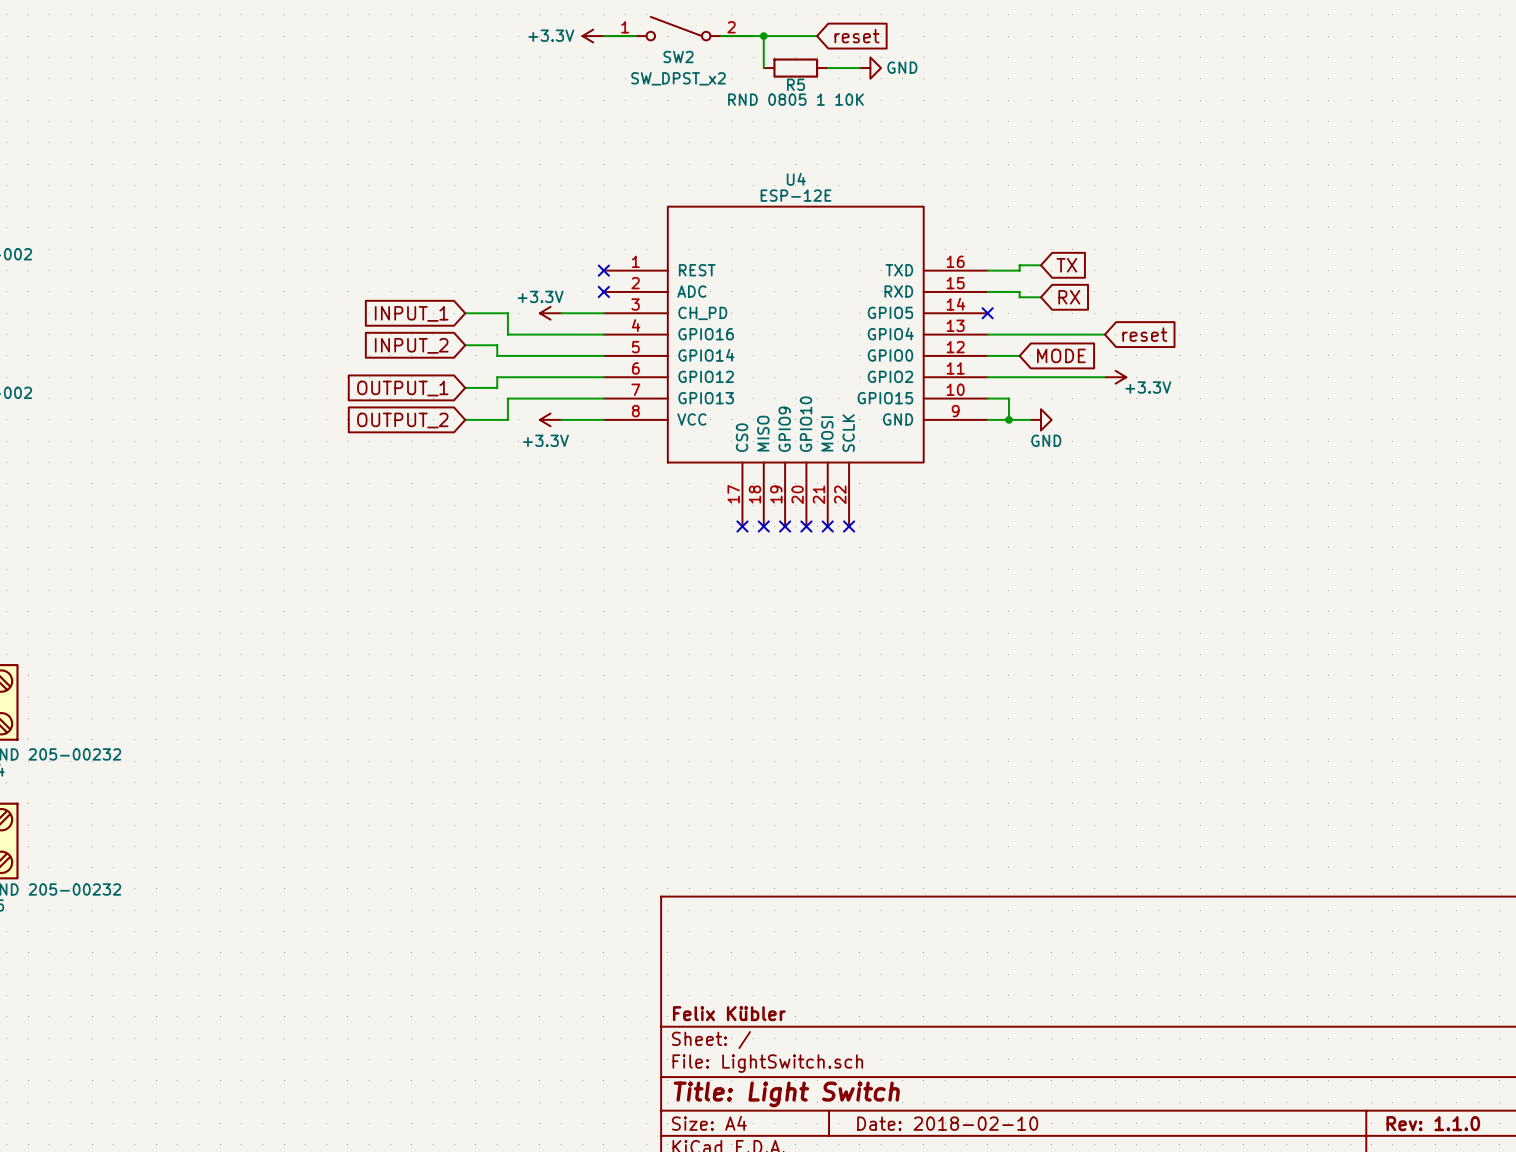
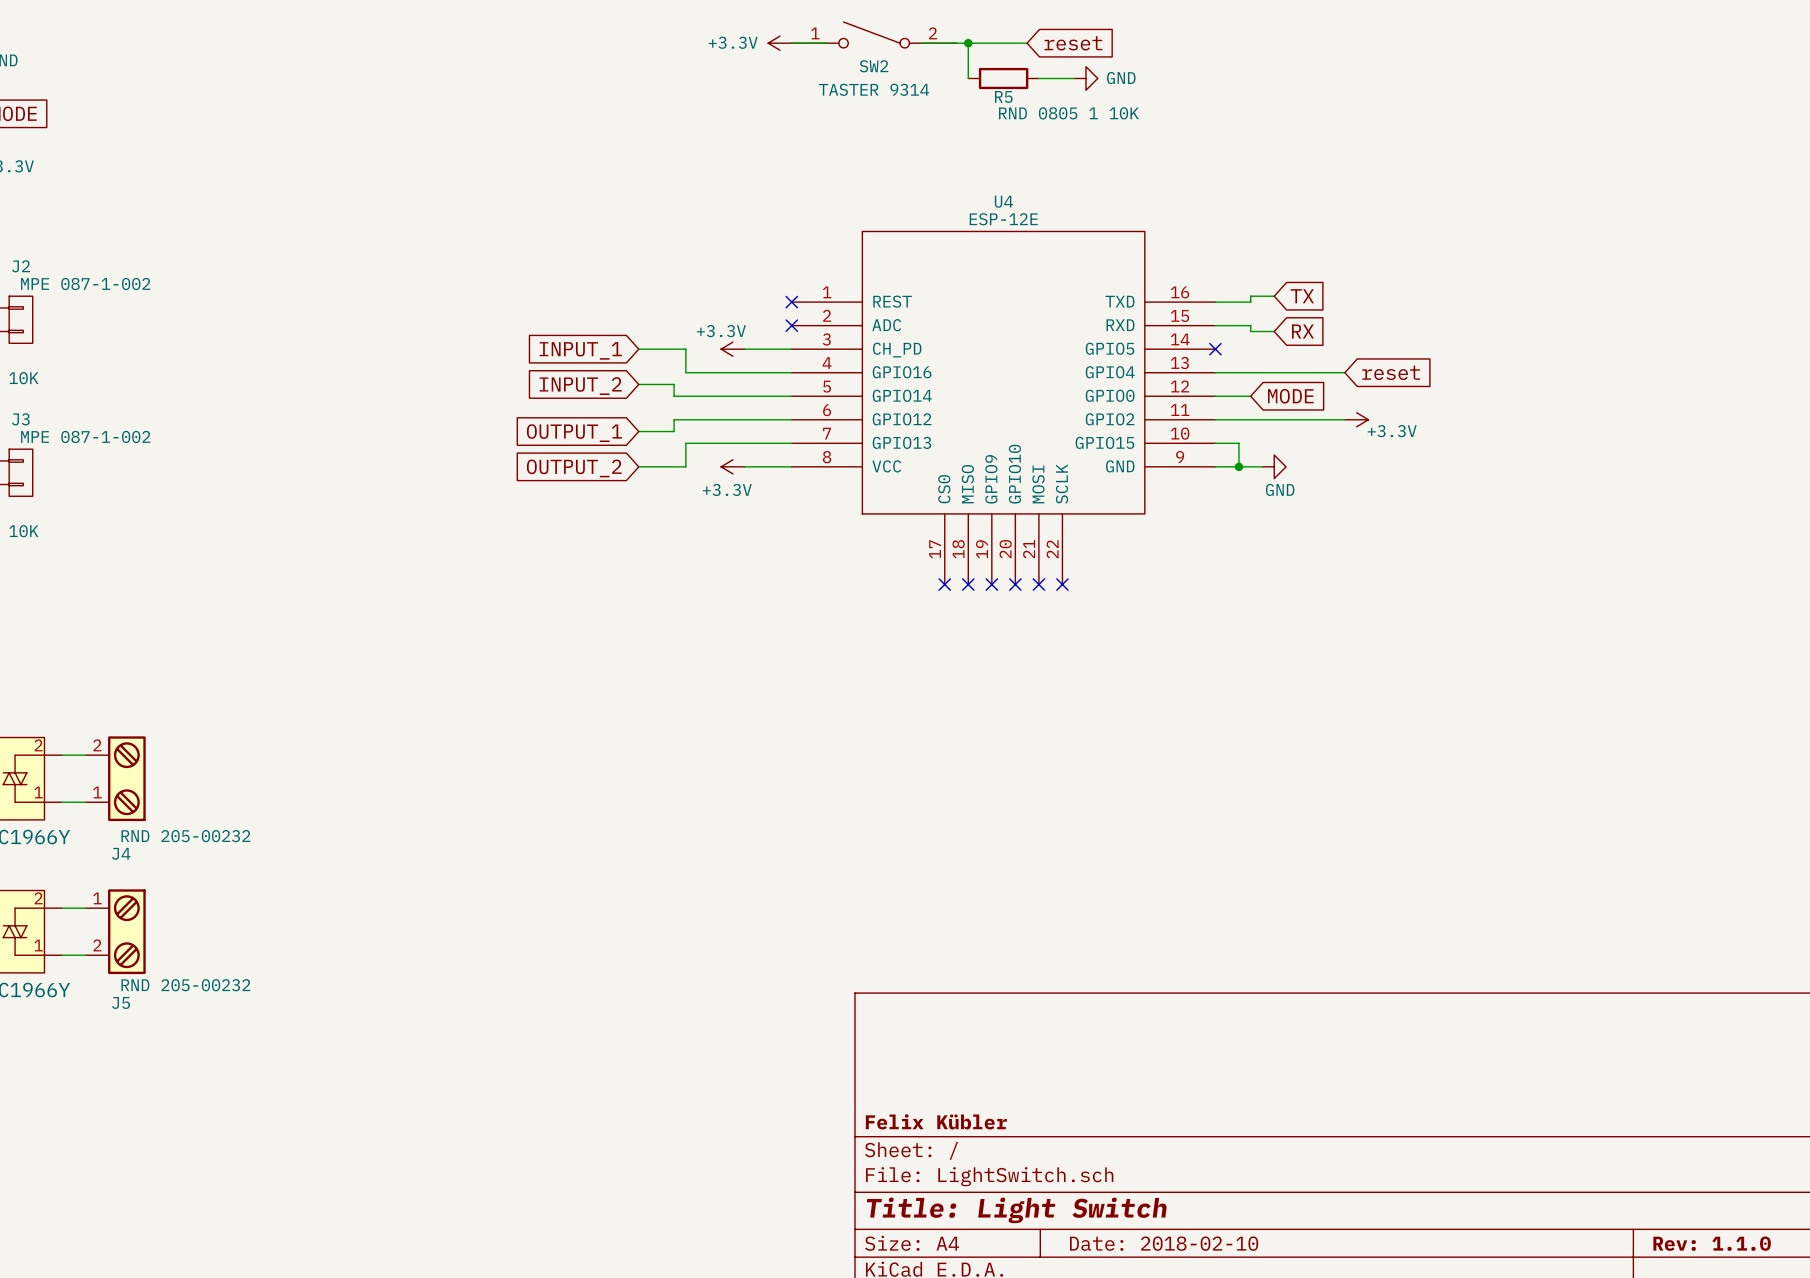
SW2 value: SW_DPST_x2 (678, 78) -> TASTER 9314 (874, 89)
R5 value position: RND 0805 1 10K (796, 99) -> RND 0805 1 10K (1068, 113)

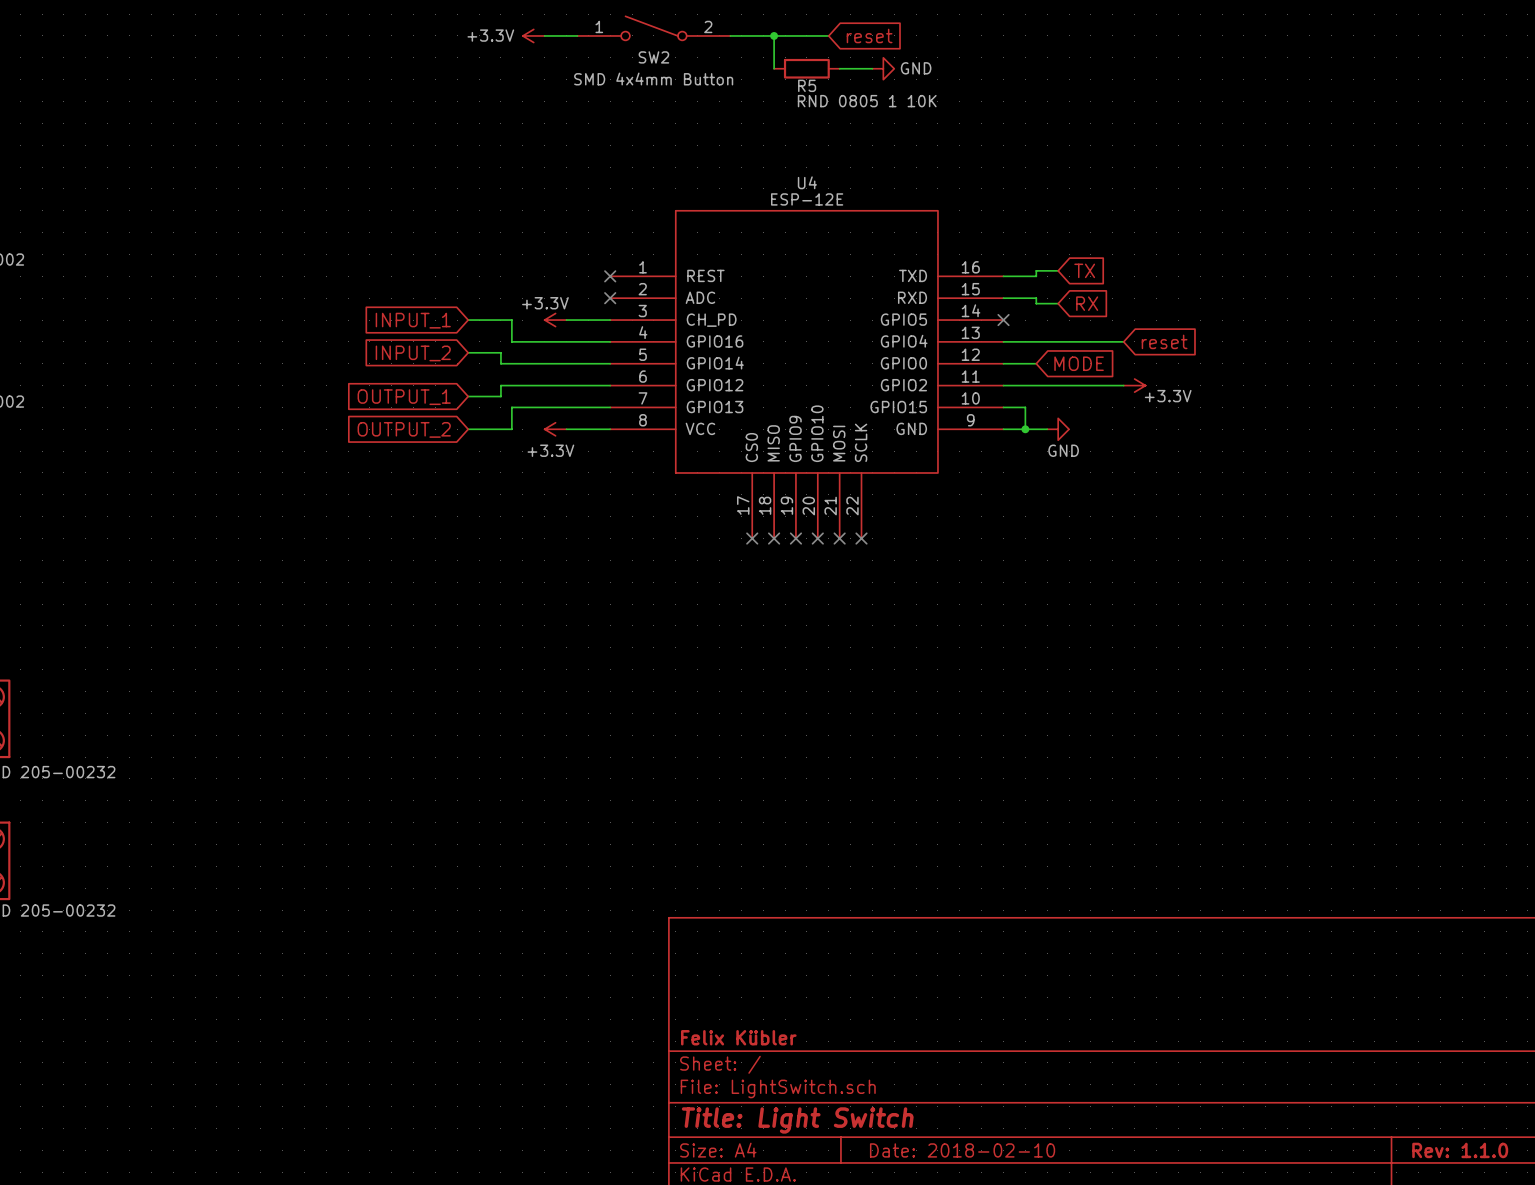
SW2 position: (874, 34) -> (653, 28)
power symbol position: +3.3V (780, 43) -> +3.3V (533, 35)
wire: (791, 43) (827, 43) -> (544, 35) (577, 35)
SW2 value: TASTER 9314 (874, 89) -> SMD 4x4mm Button (653, 79)

